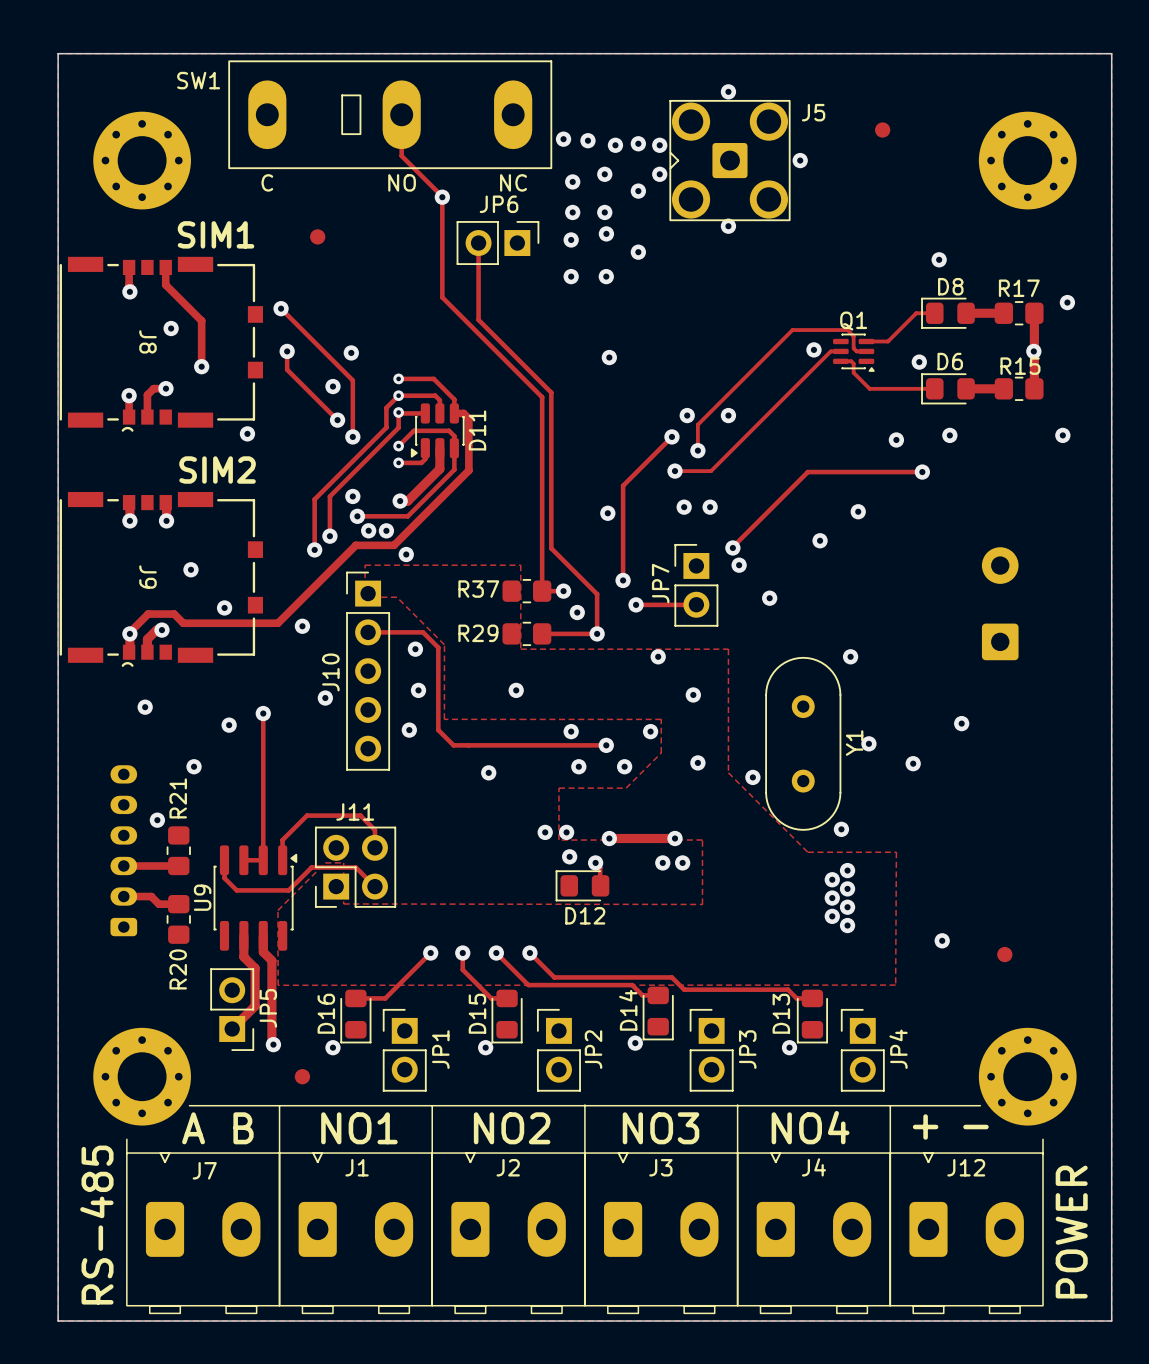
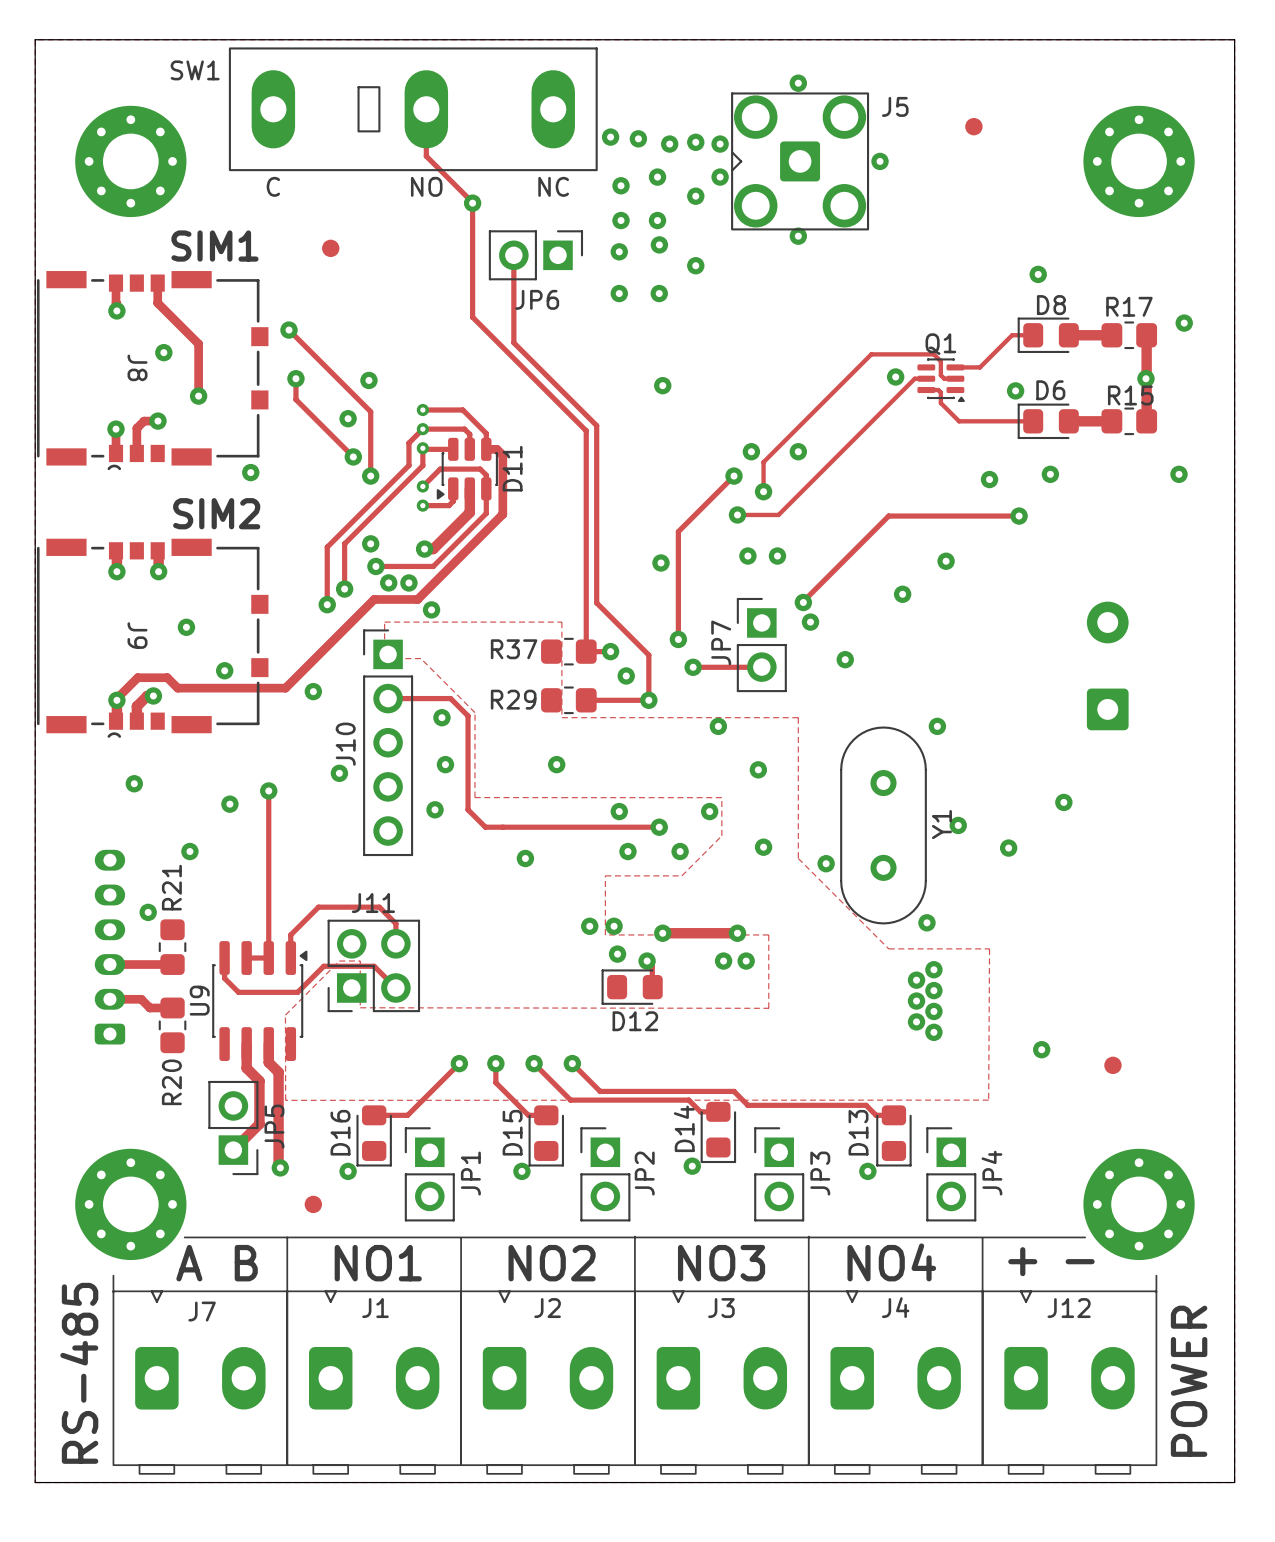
JP6 name position: JP6 (499, 204) -> JP6 (537, 299)

